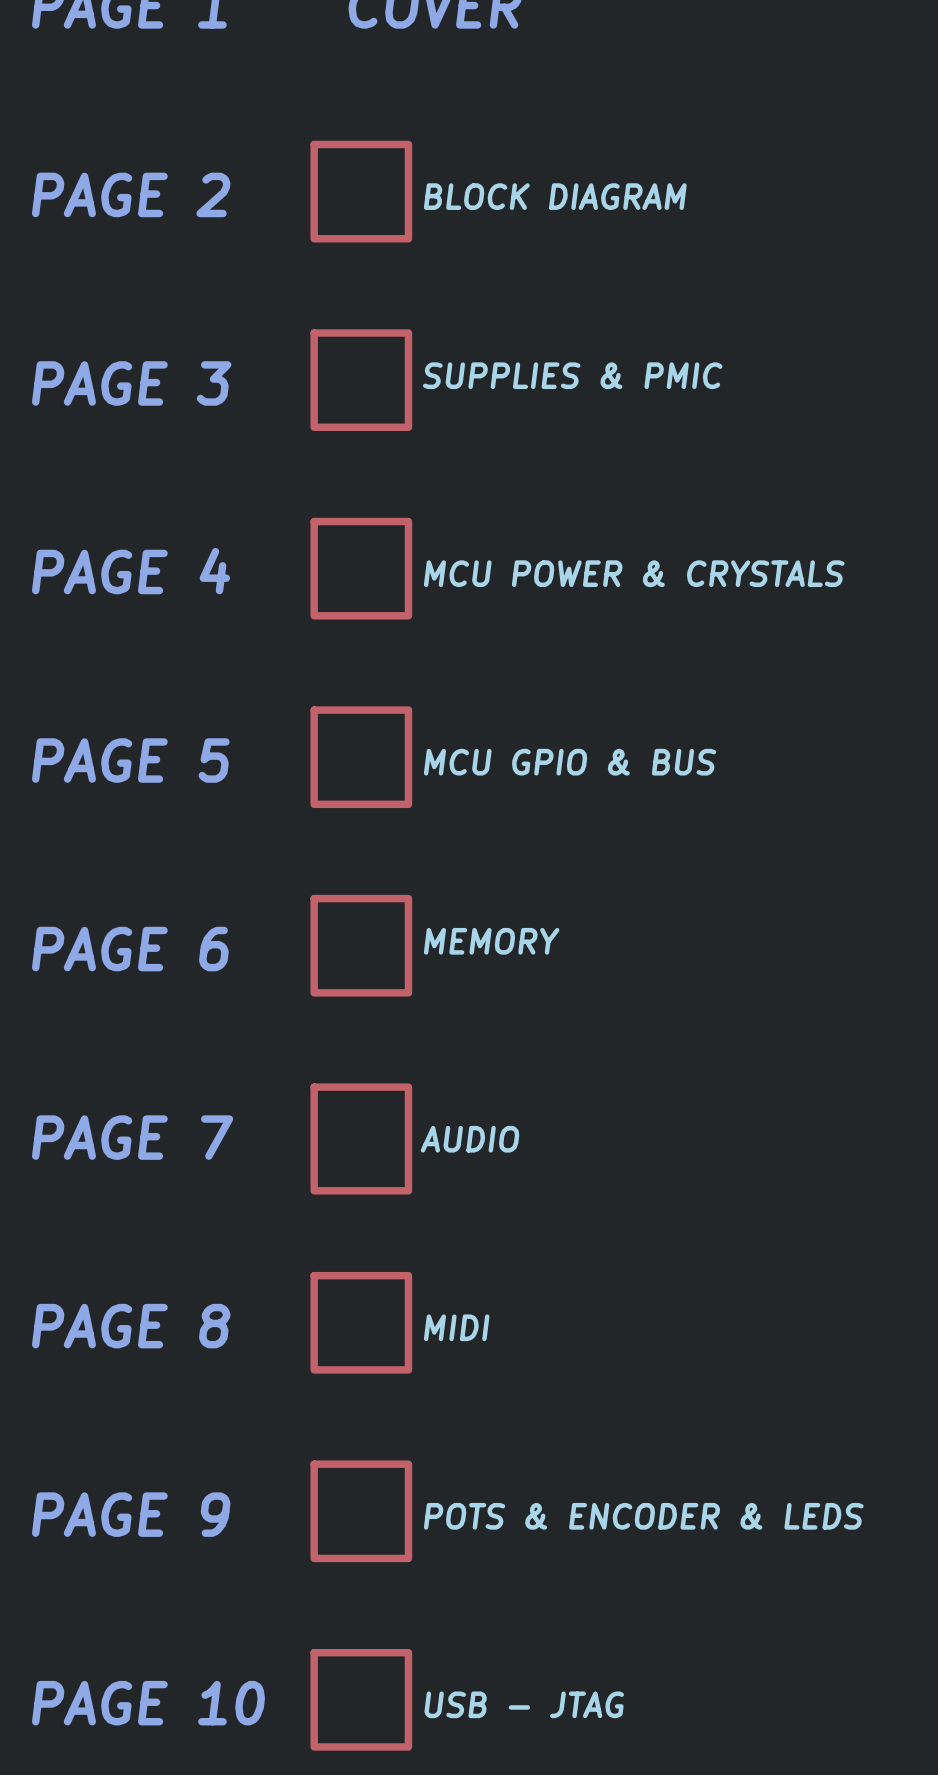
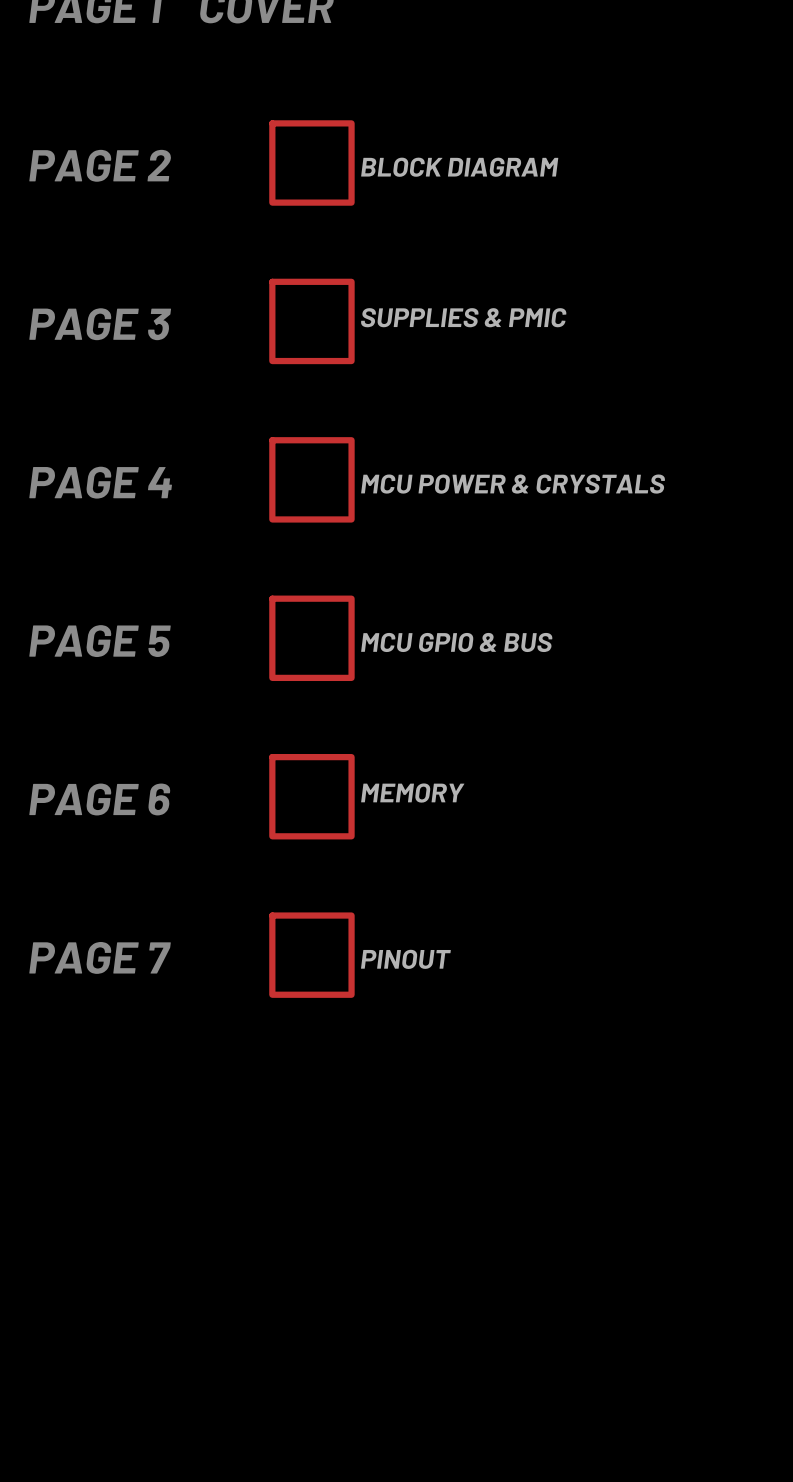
sheet PINOUT: none -> (311, 955)
sheet AUDIO: (361, 1138) -> none
sheet MIDI: (361, 1322) -> none
text: PAGE 8 (131, 1326) -> none
sheet POTS & ENCODER & LEDS: (361, 1511) -> none
text: PAGE 9 (131, 1514) -> none
sheet USB - JTAG: (361, 1699) -> none
text: PAGE 10 (148, 1703) -> none

